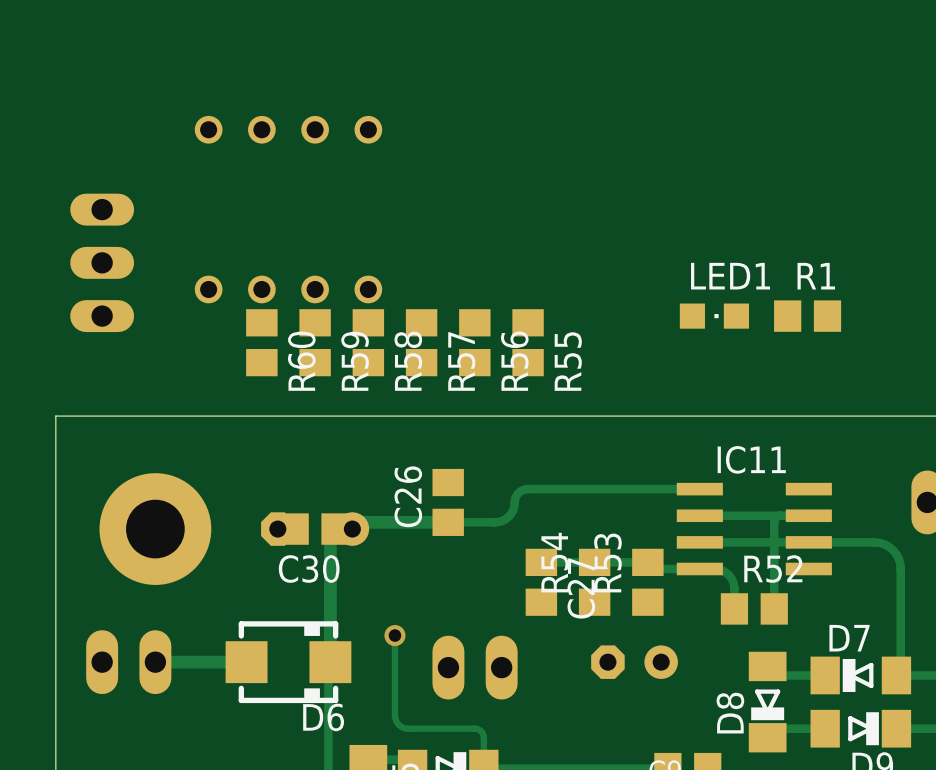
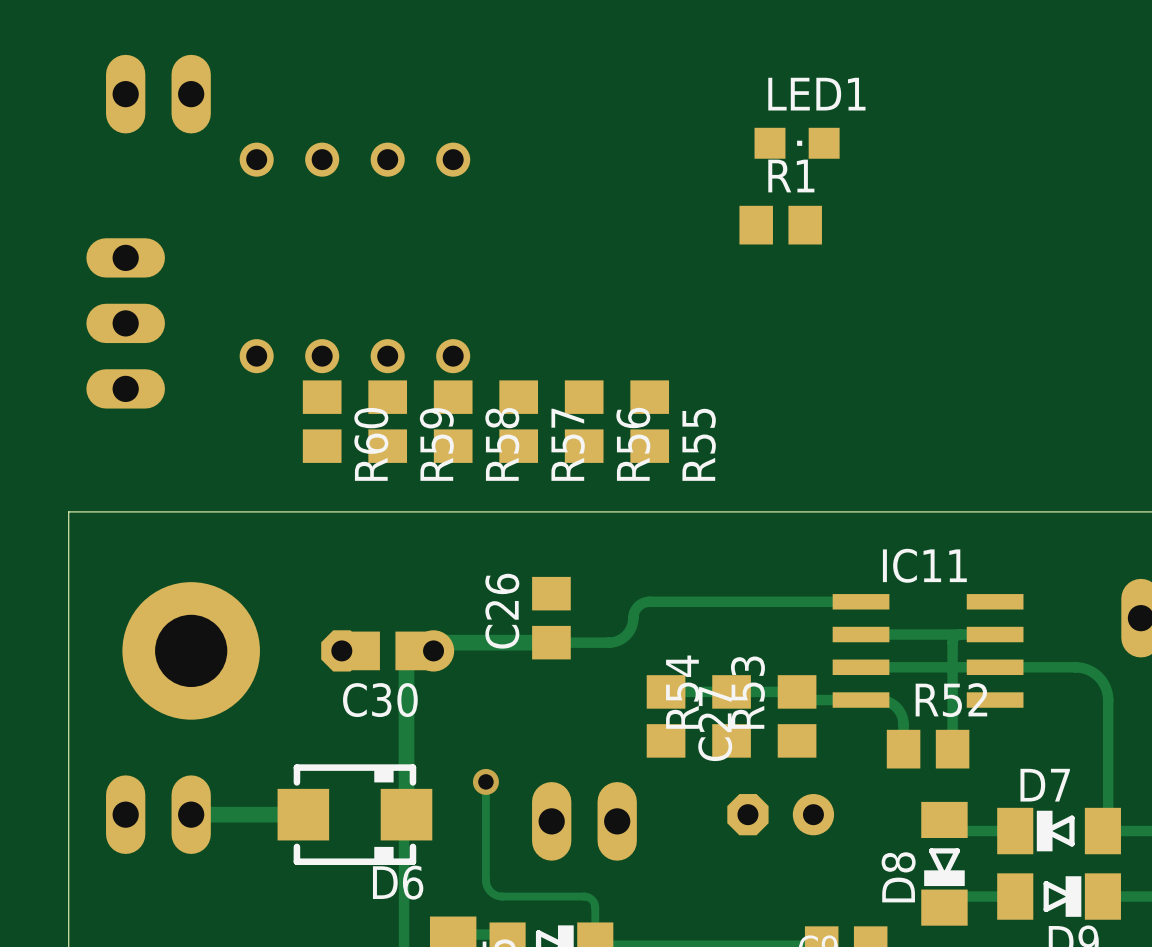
part: none -> (158, 94)
LED1 position: (714, 316) -> (797, 143)
R1 position: (807, 316) -> (780, 225)

